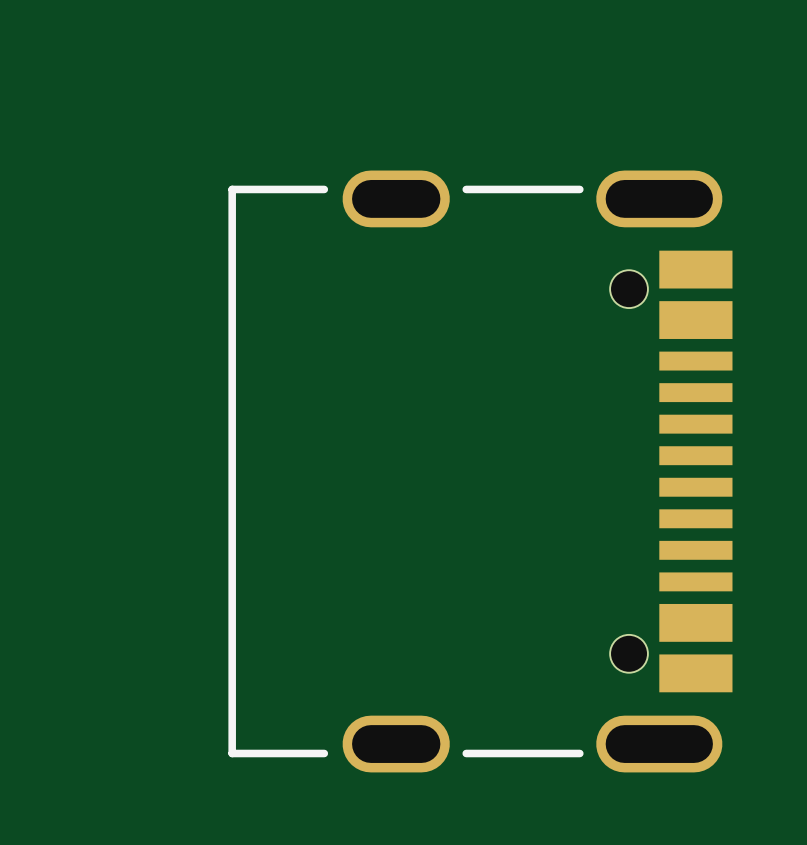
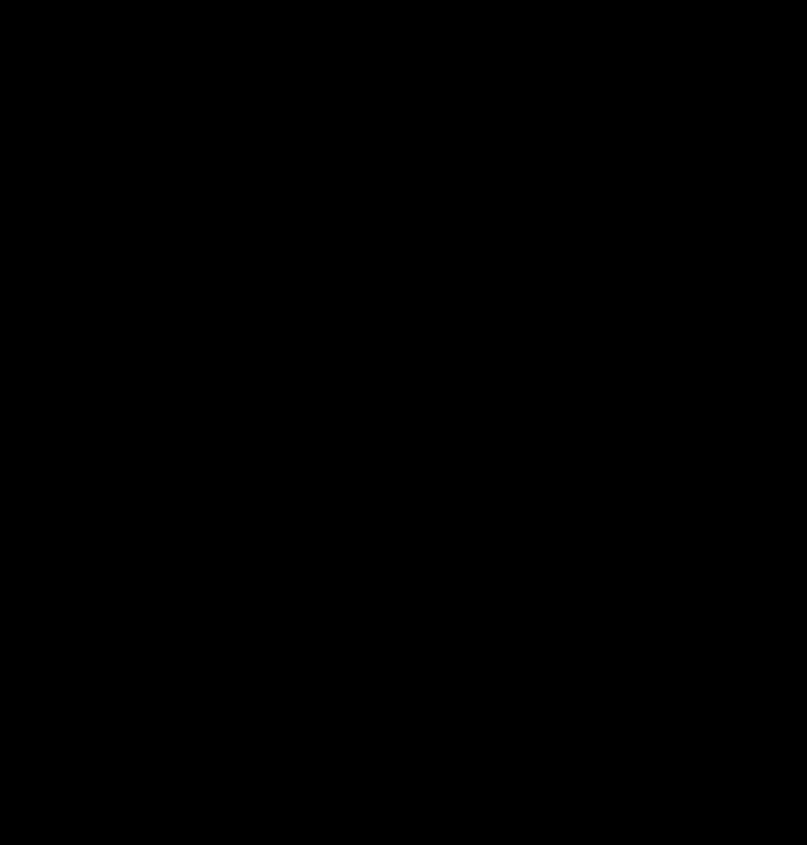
part: (480, 471) -> none

